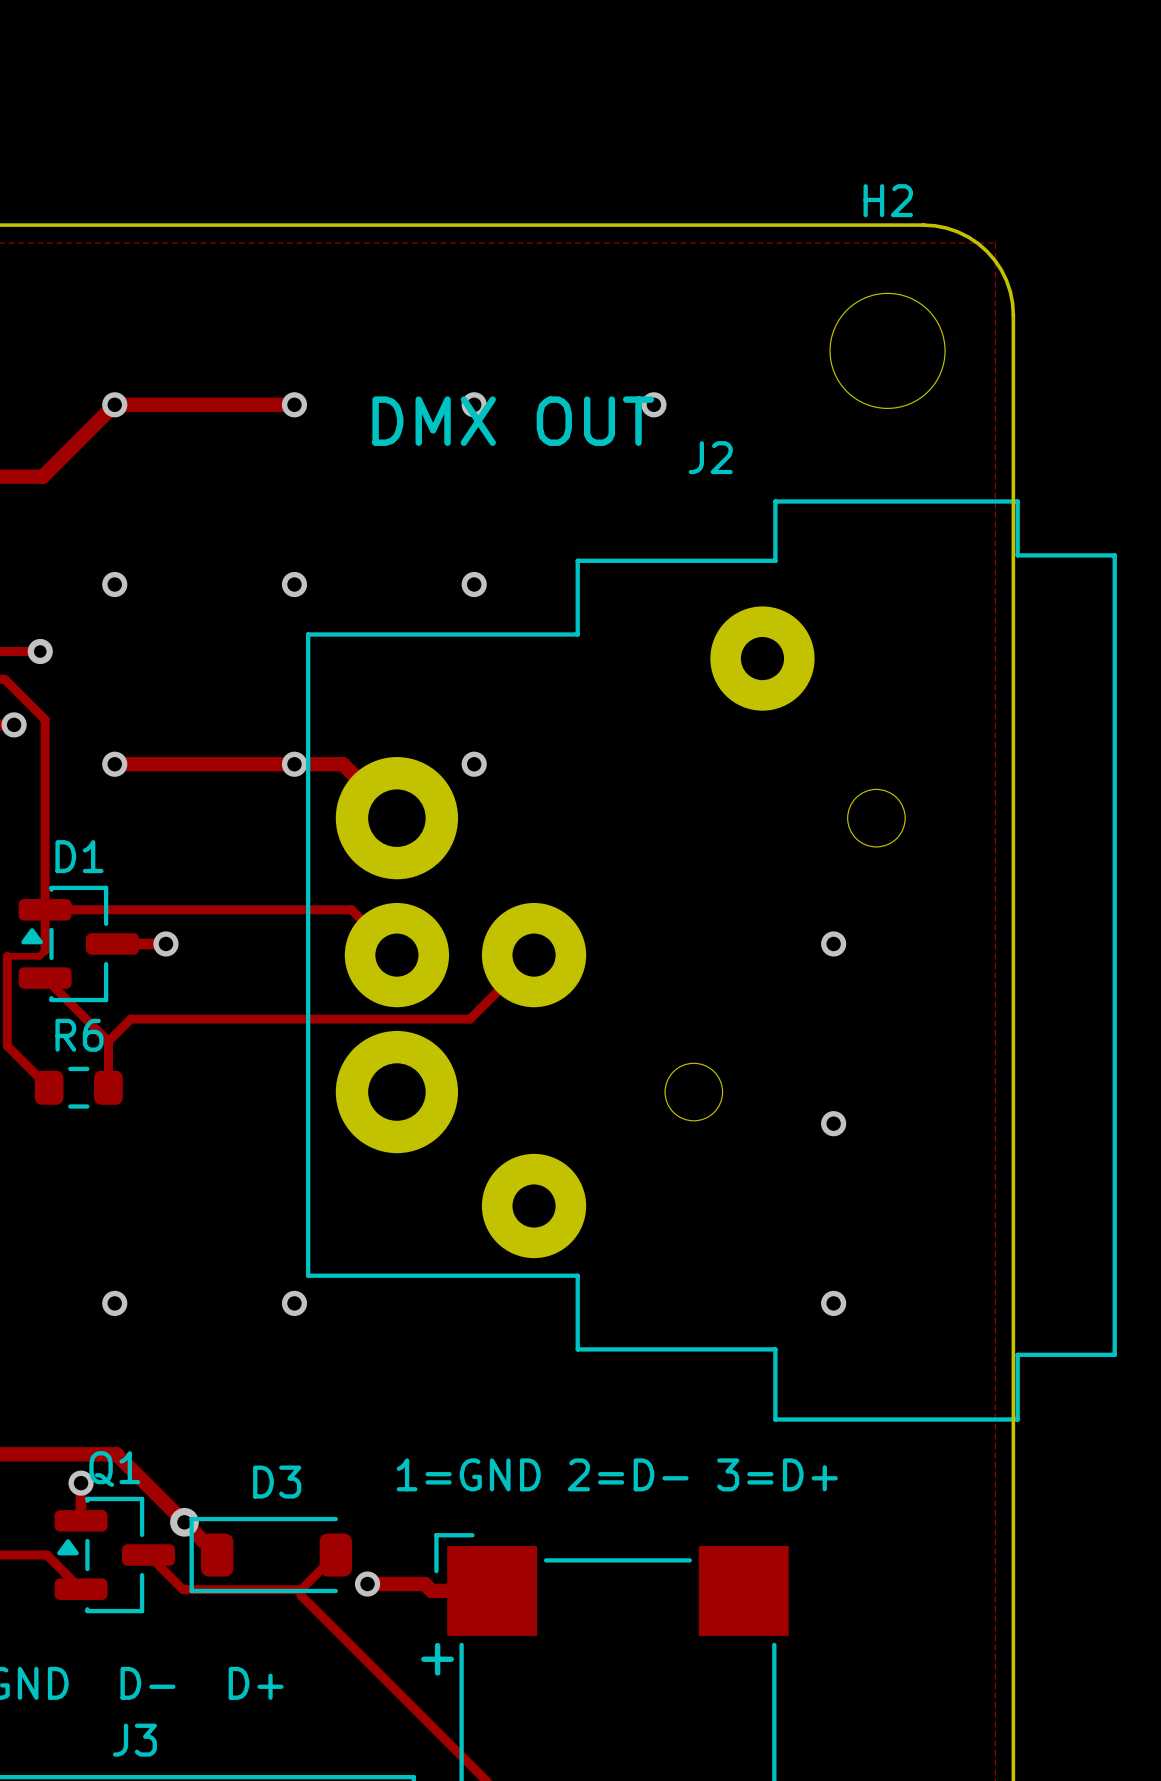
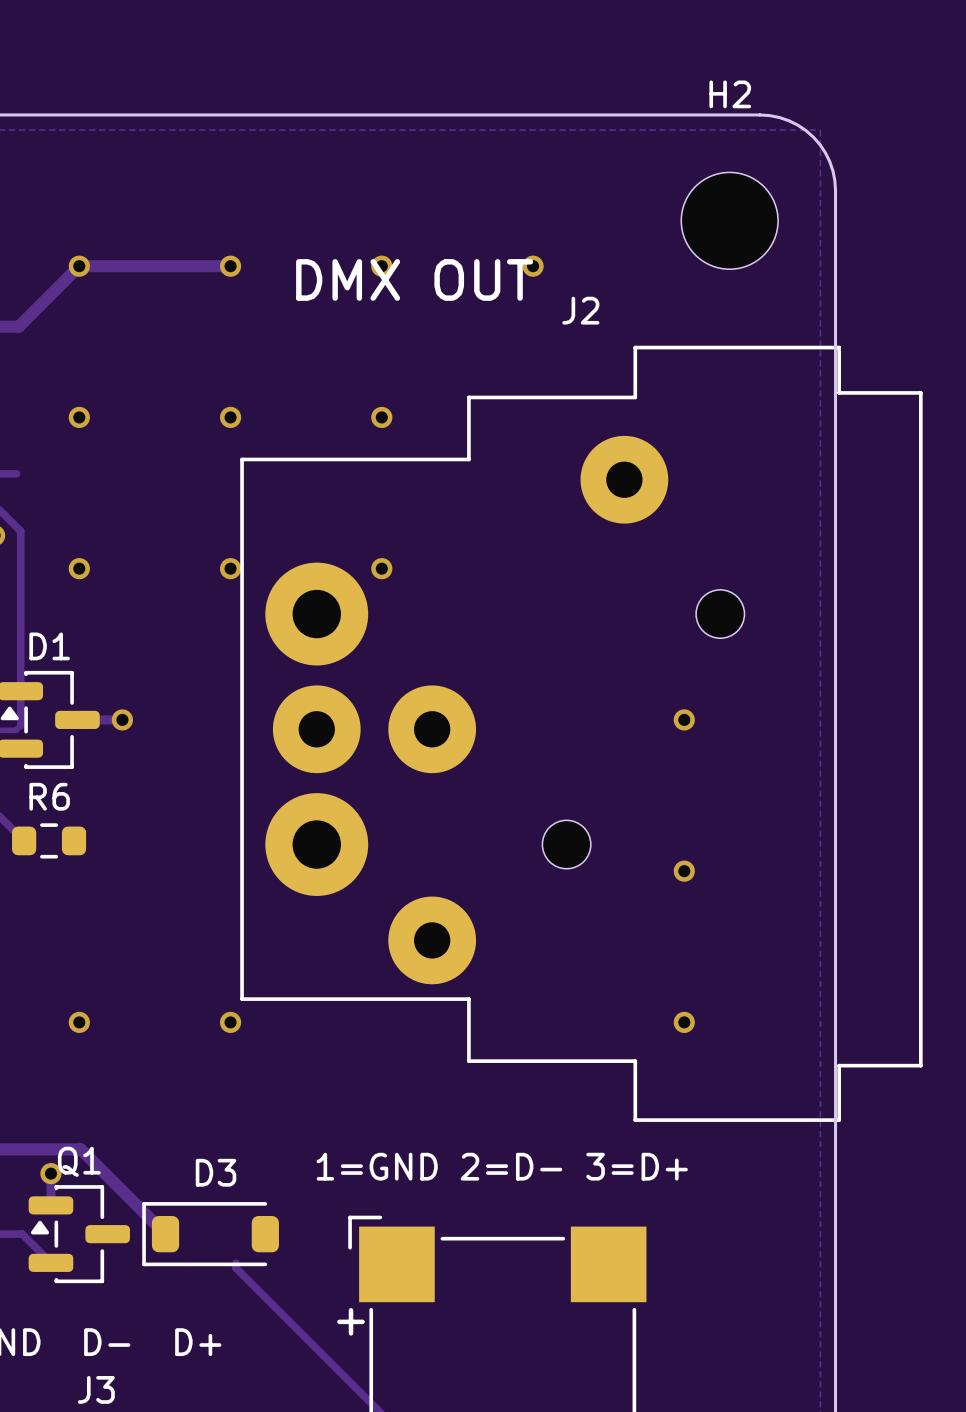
via: (40, 651) -> none
track: (114, 764) (343, 764) (396, 818) -> none
track: (45, 909) (351, 909) (396, 955) -> none
track: (534, 955) (470, 1019) (130, 1019) (108, 1041) -> none
track: (45, 978) (108, 1041) -> none
track: (108, 1041) (108, 1087) -> none
via: (184, 1522) -> none
track: (148, 1555) (183, 1589) (301, 1589) (335, 1555) -> none
track: (367, 1584) (424, 1584) (431, 1590) (492, 1590) -> none
via: (367, 1584) -> none

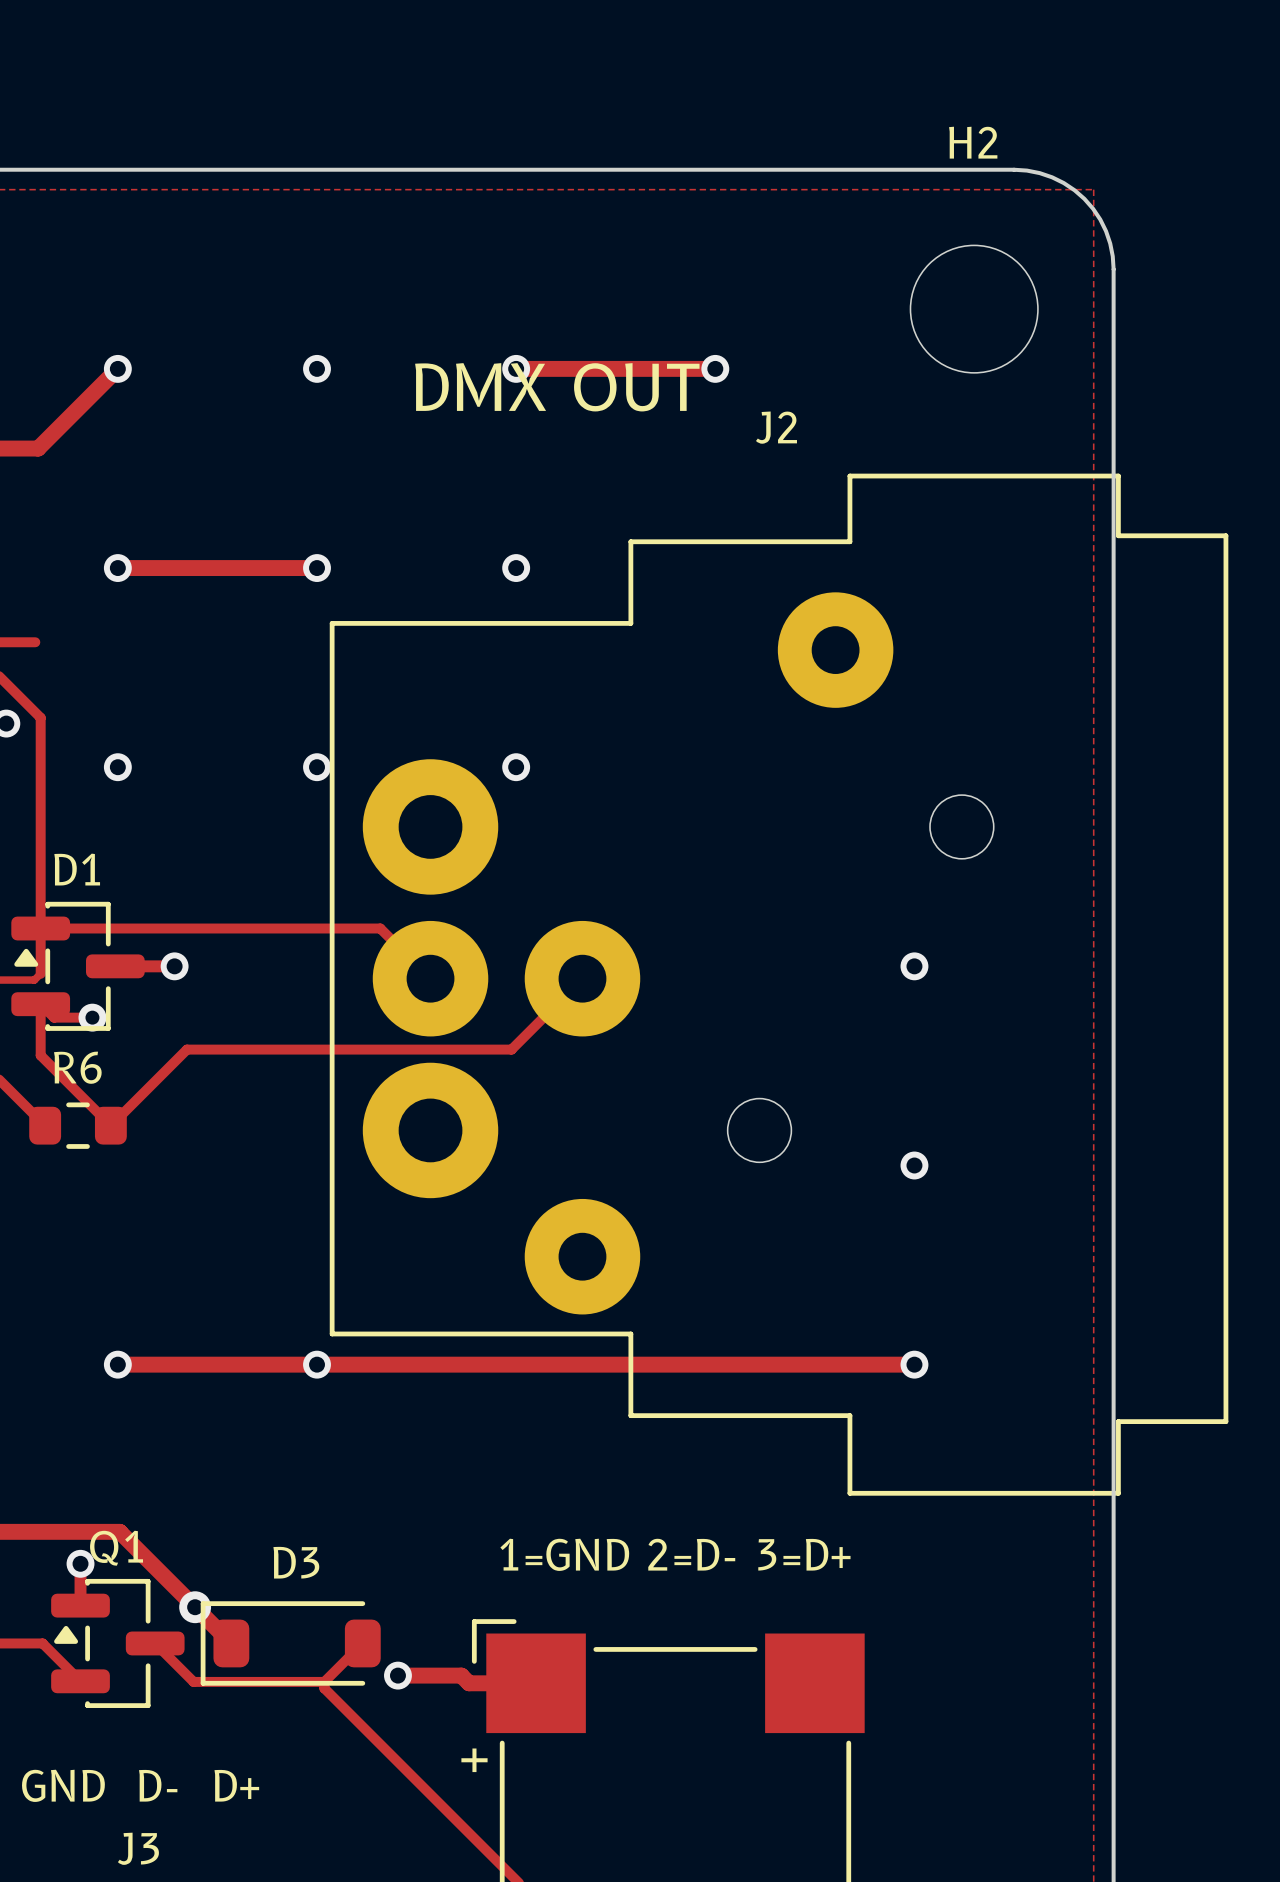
track: (79, 266) (230, 266) -> (117, 568) (317, 568)
track: none -> (516, 368) (715, 368)
track: none -> (40, 928) (380, 928) (430, 978)
track: none -> (582, 978) (511, 1049) (186, 1049) (110, 1125) (40, 1055) (40, 1004) (54, 1017) (92, 1017)
via: none -> (92, 1017)
track: none -> (117, 1364) (914, 1364)
via: none -> (195, 1607)
track: none -> (155, 1643) (193, 1681) (324, 1681) (362, 1643)
track: none -> (397, 1675) (461, 1675) (469, 1683) (536, 1683)
via: none -> (397, 1675)

